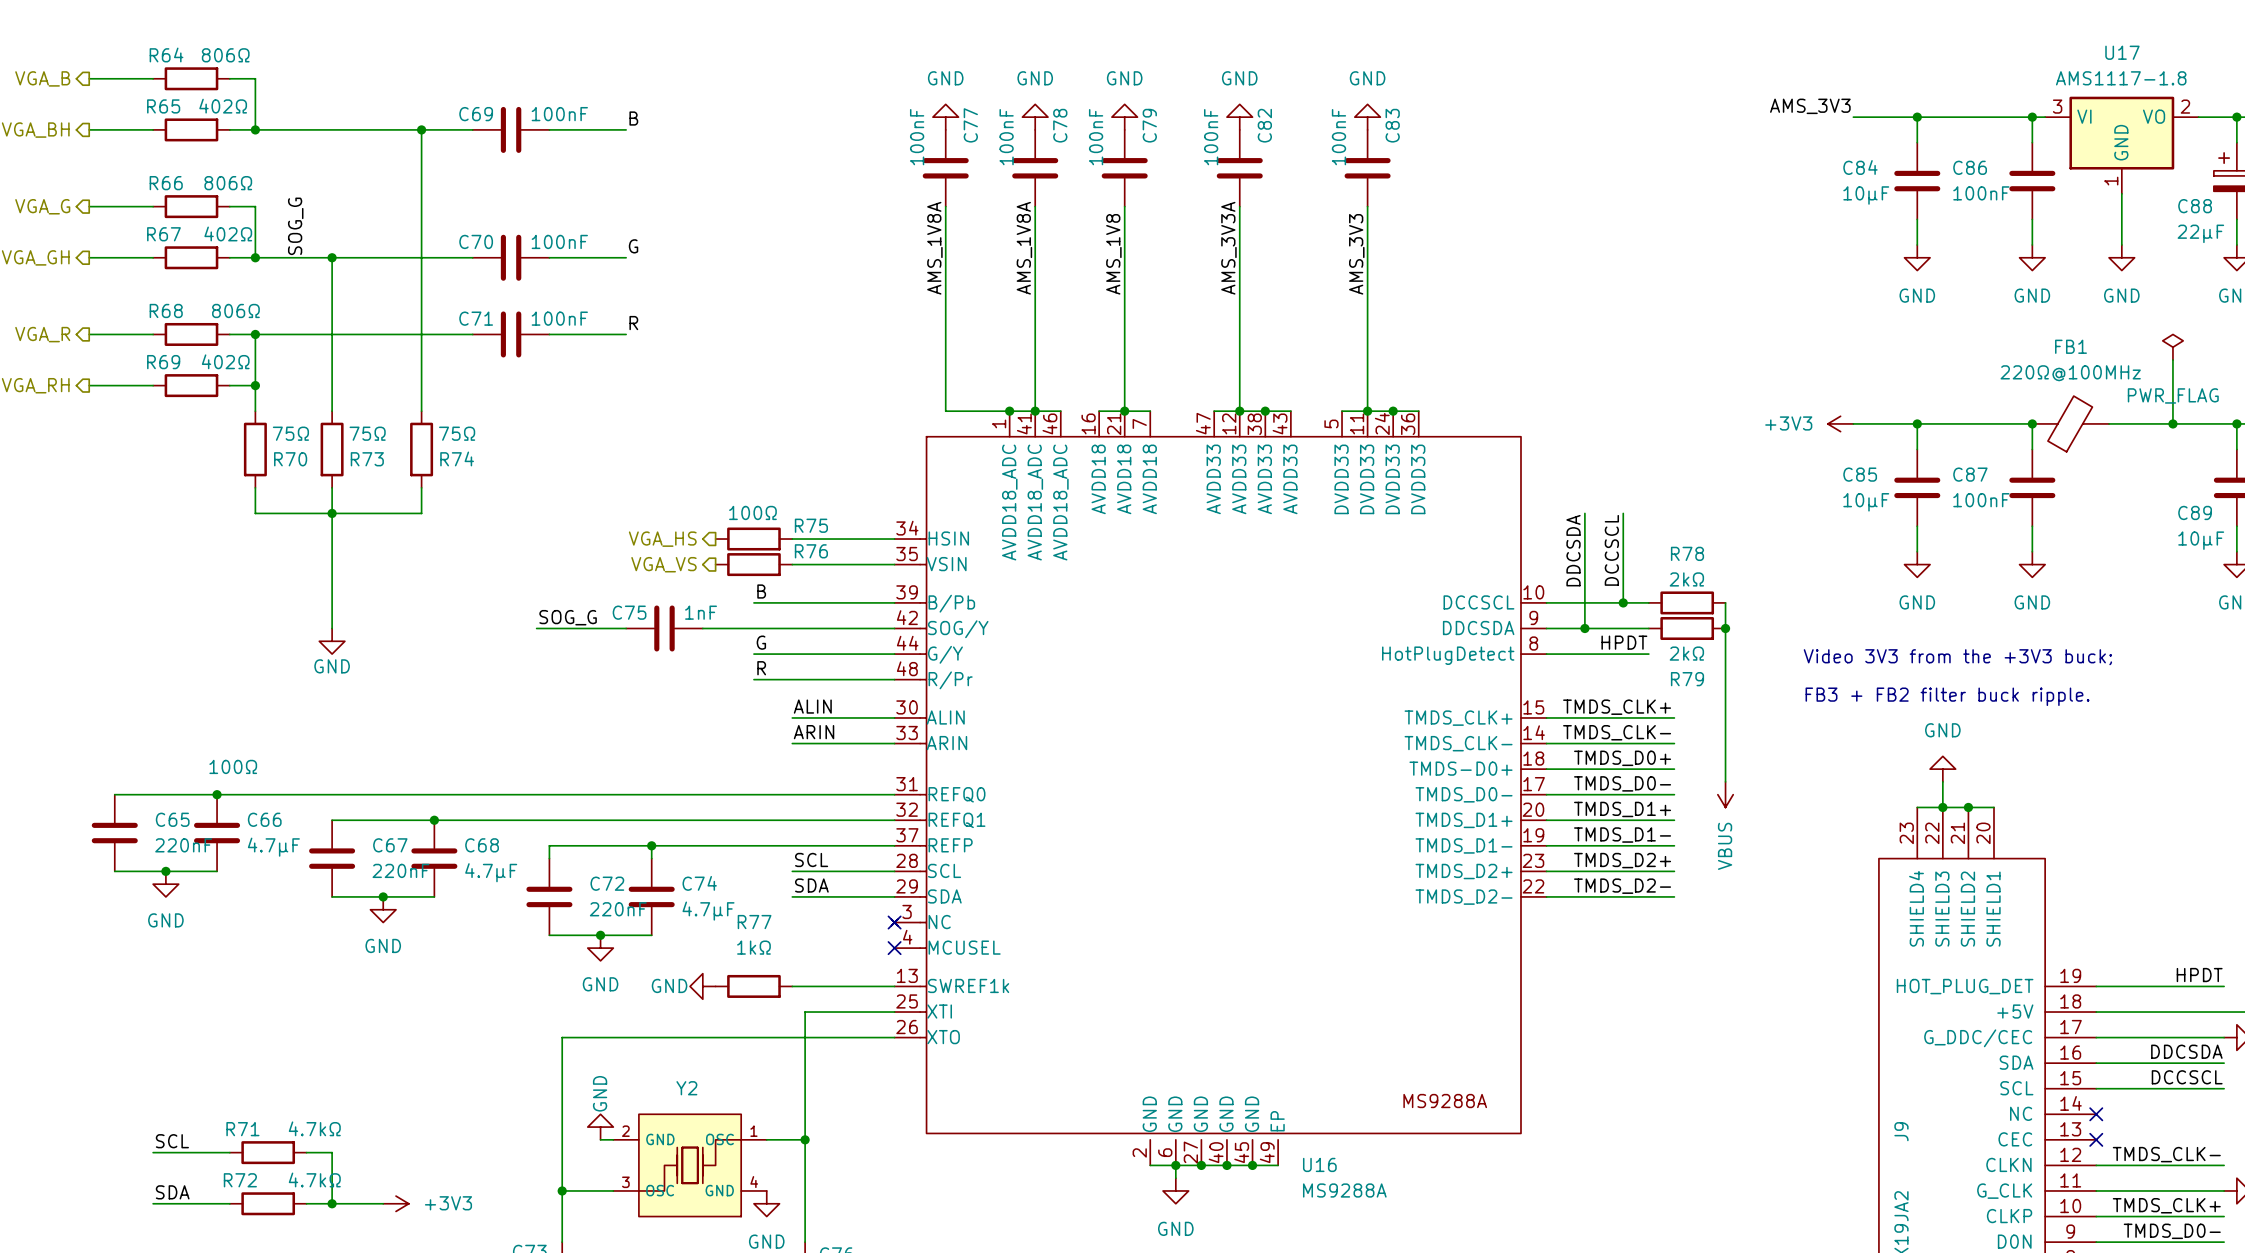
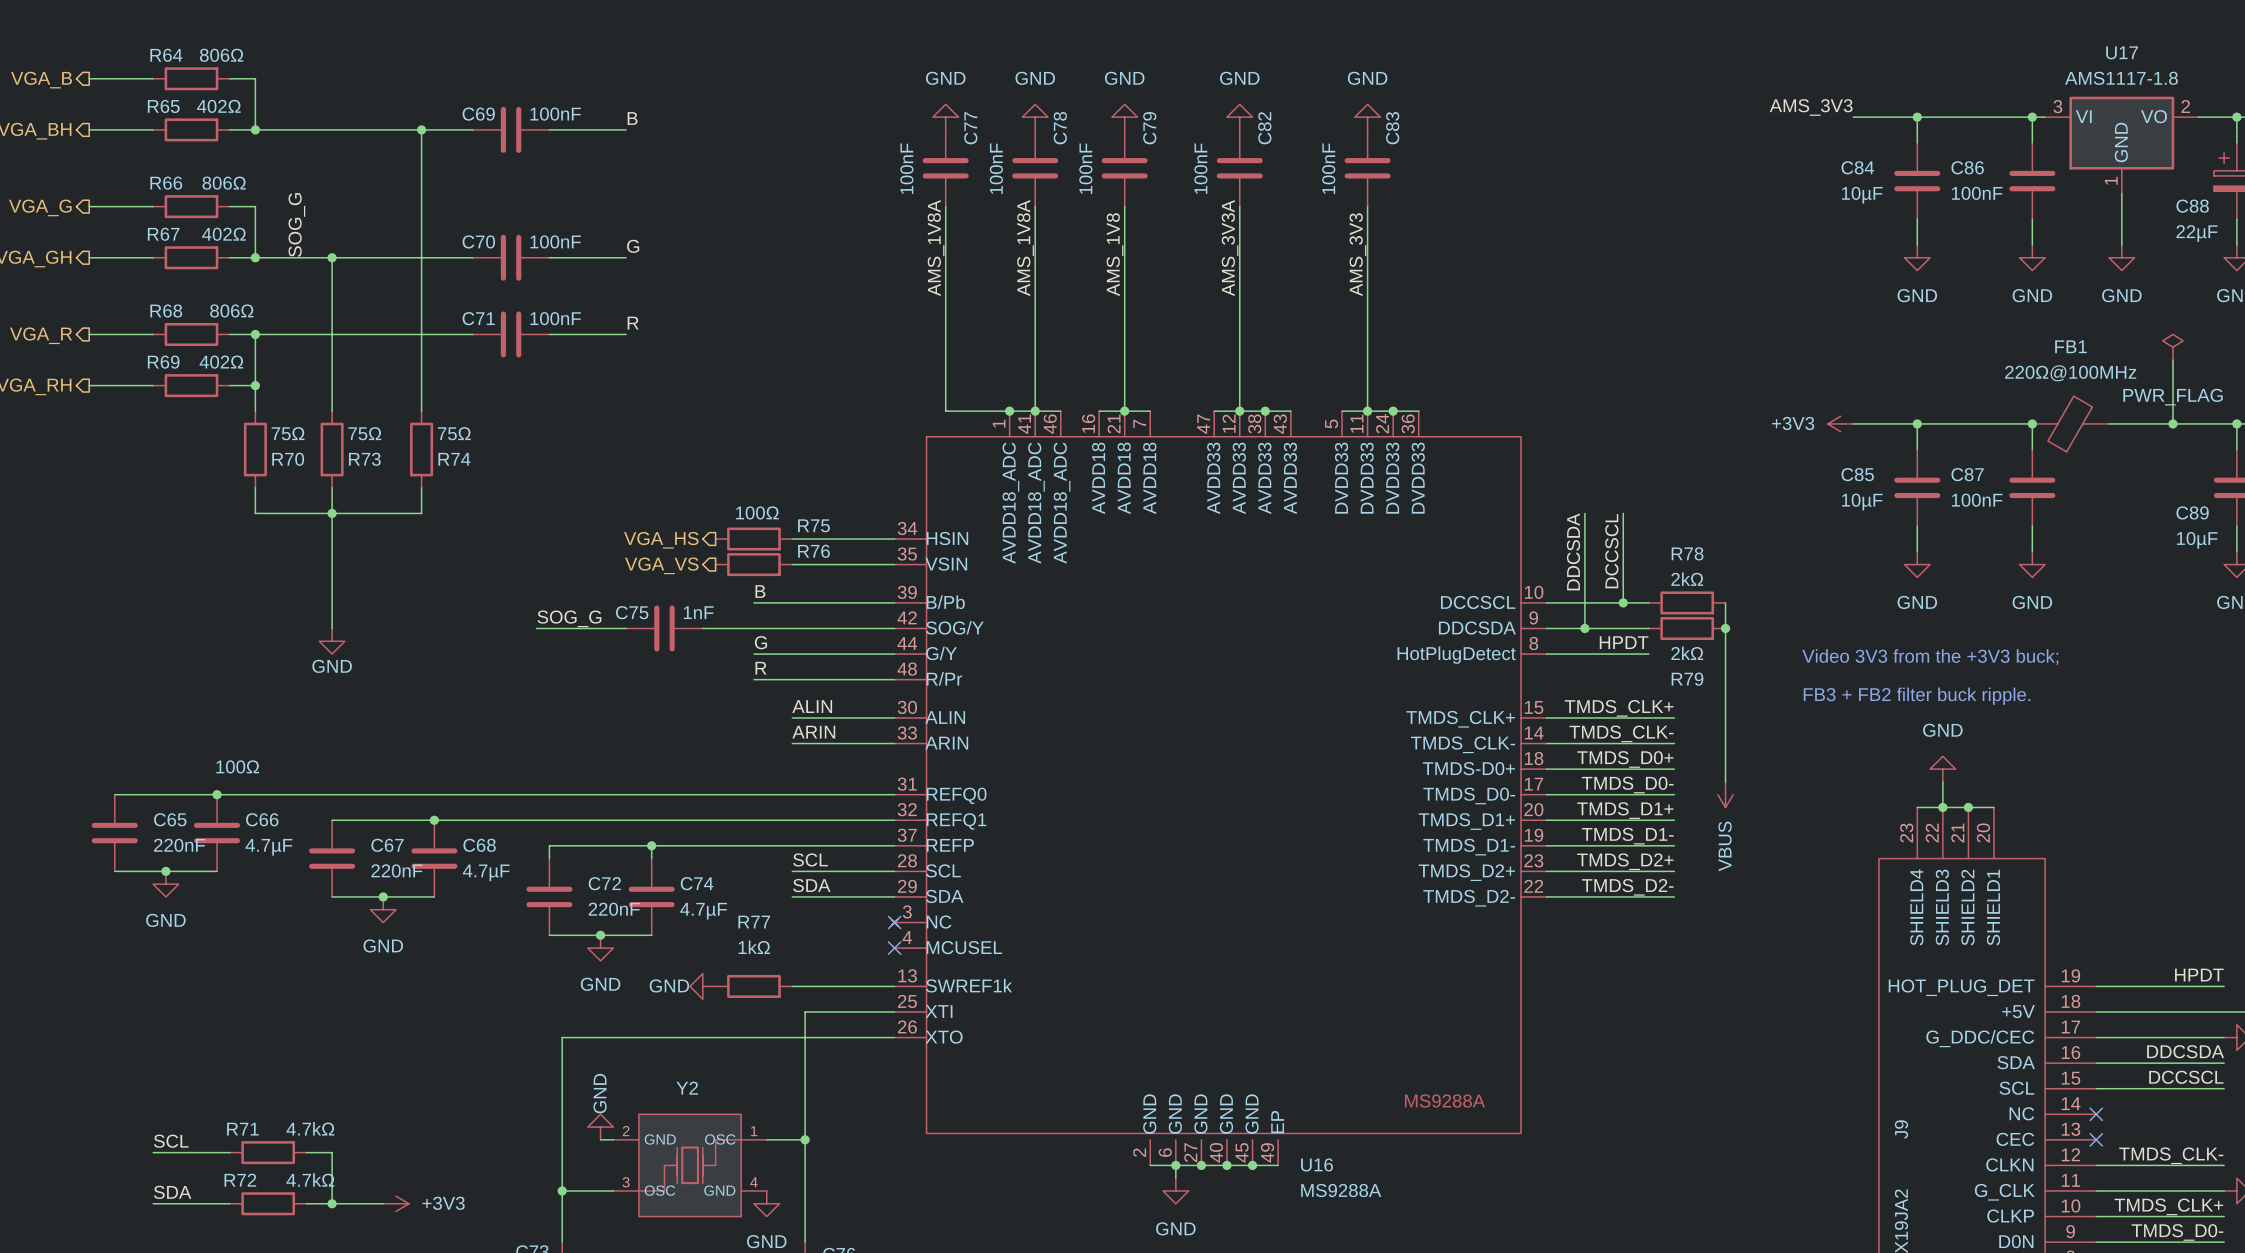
C77 value position: 100nF (917, 137) -> 100nF (906, 168)
C78 value position: 100nF (1006, 137) -> 100nF (996, 168)
C79 value position: 100nF (1096, 137) -> 100nF (1085, 168)
C82 value position: 100nF (1211, 137) -> 100nF (1200, 168)
C83 value position: 100nF (1338, 137) -> 100nF (1328, 168)

